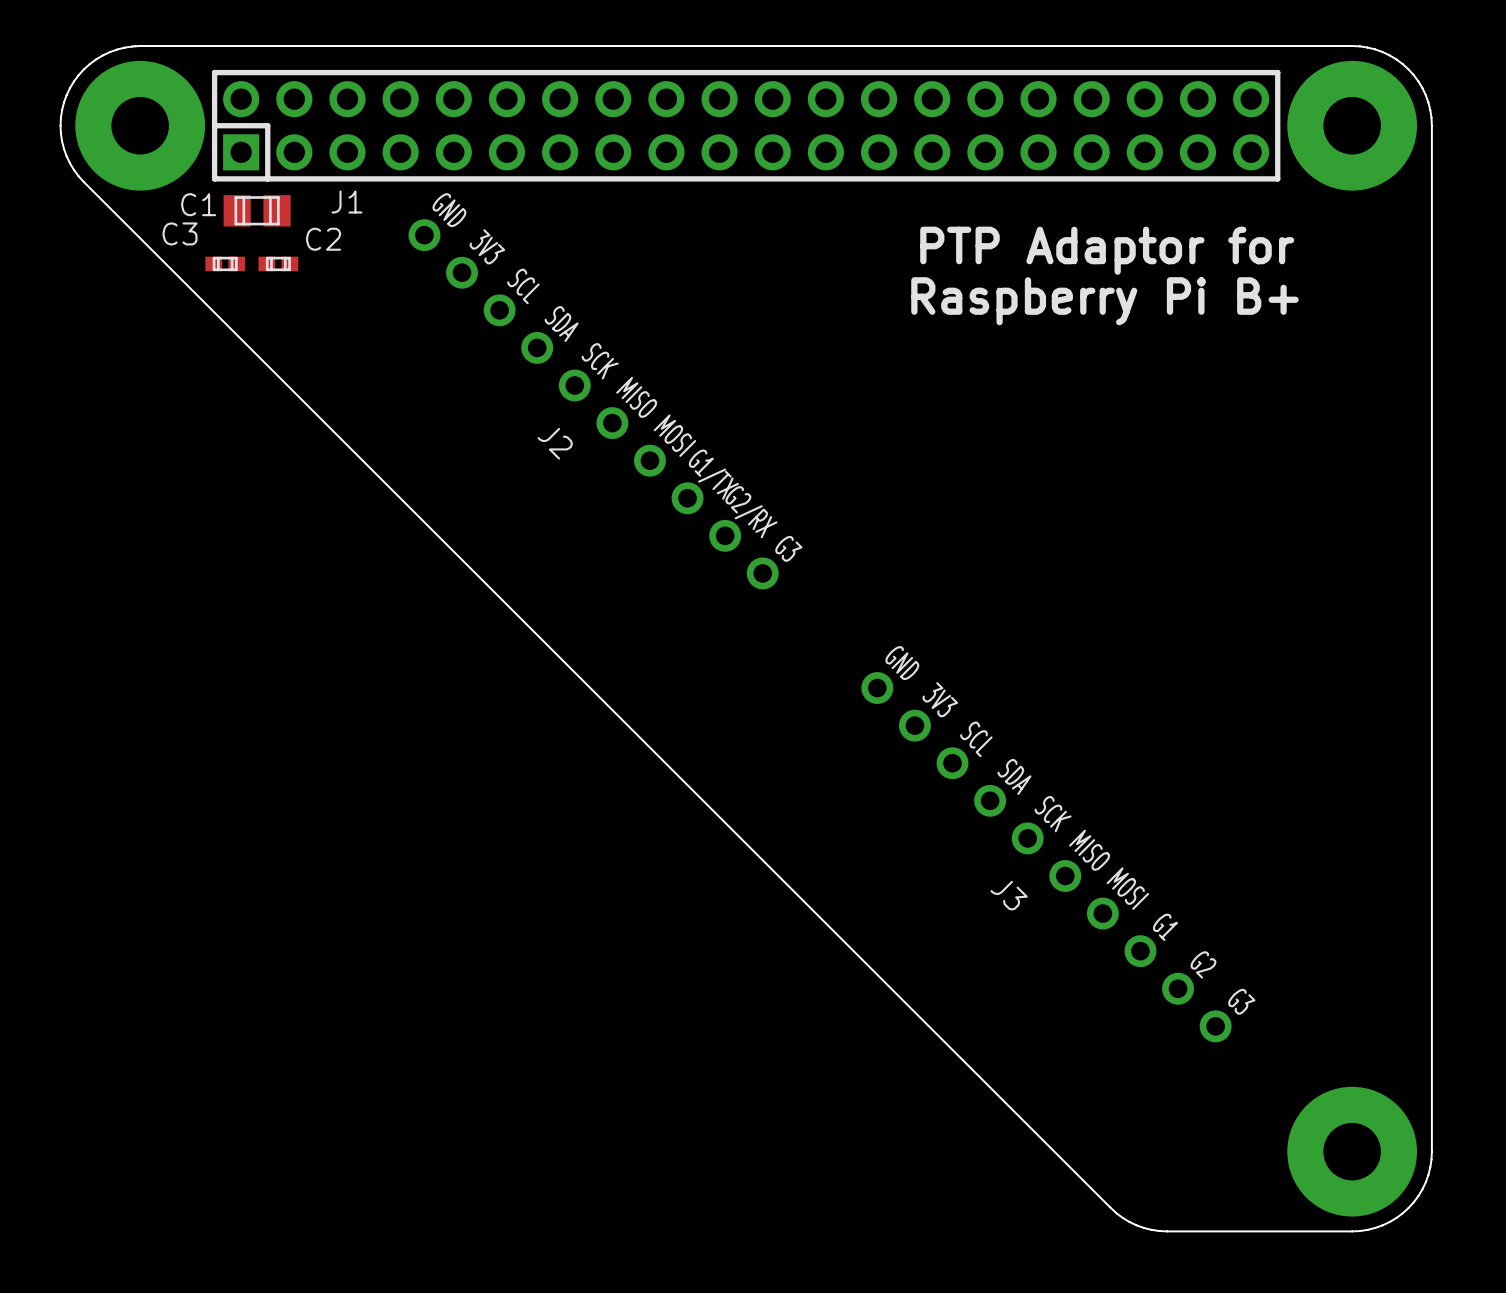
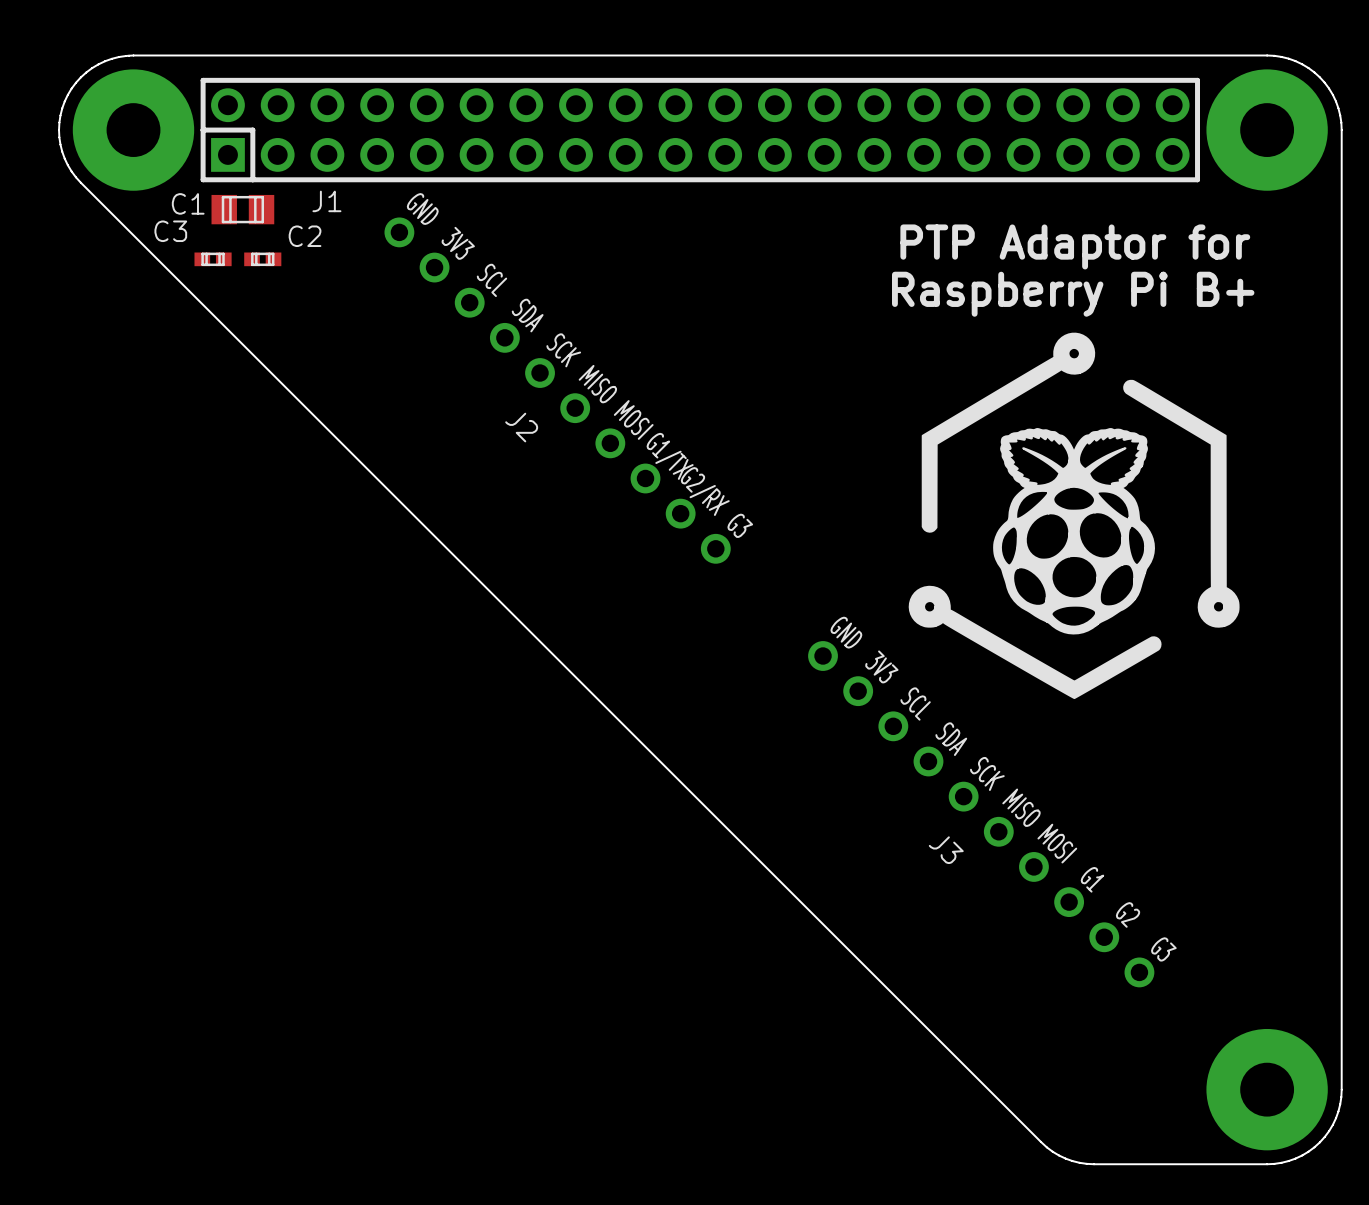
text position: PTP Adaptor for (1107, 250) -> PTP Adaptor for (1075, 246)
text position: Raspberry Pi B+ (1104, 301) -> Raspberry Pi B+ (1073, 294)
drawing: none -> [908, 332, 1240, 700]

